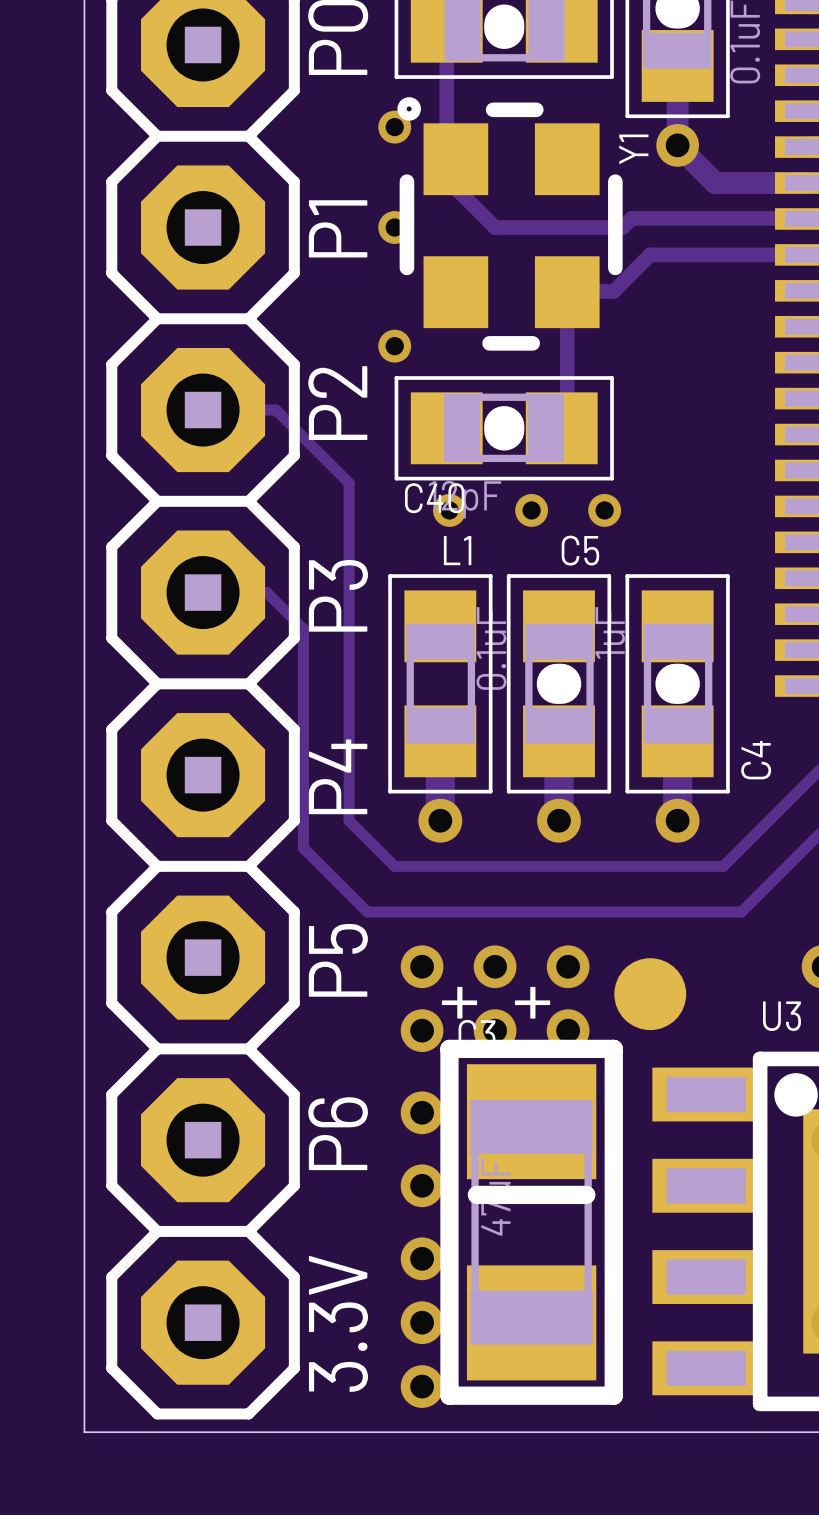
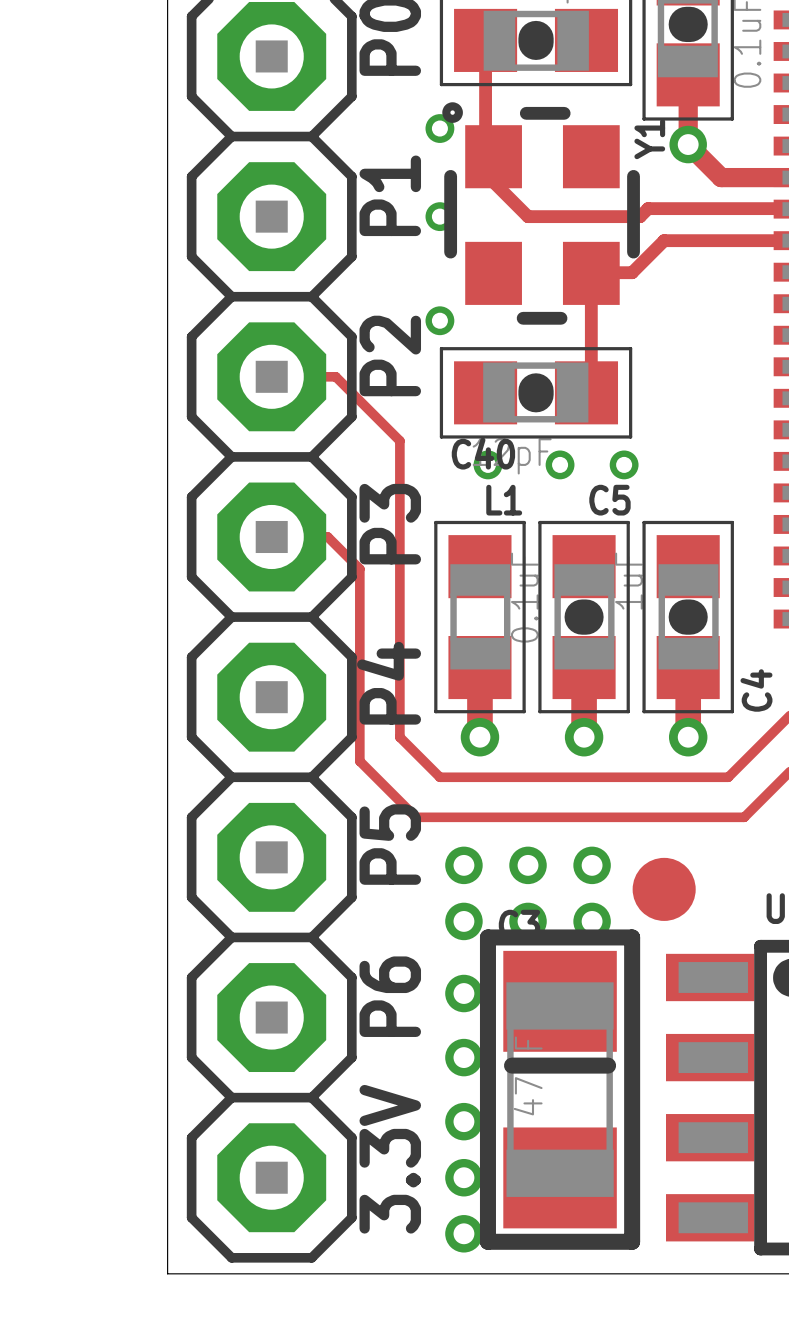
text: + (459, 1002) -> none
text: + (532, 1002) -> none

